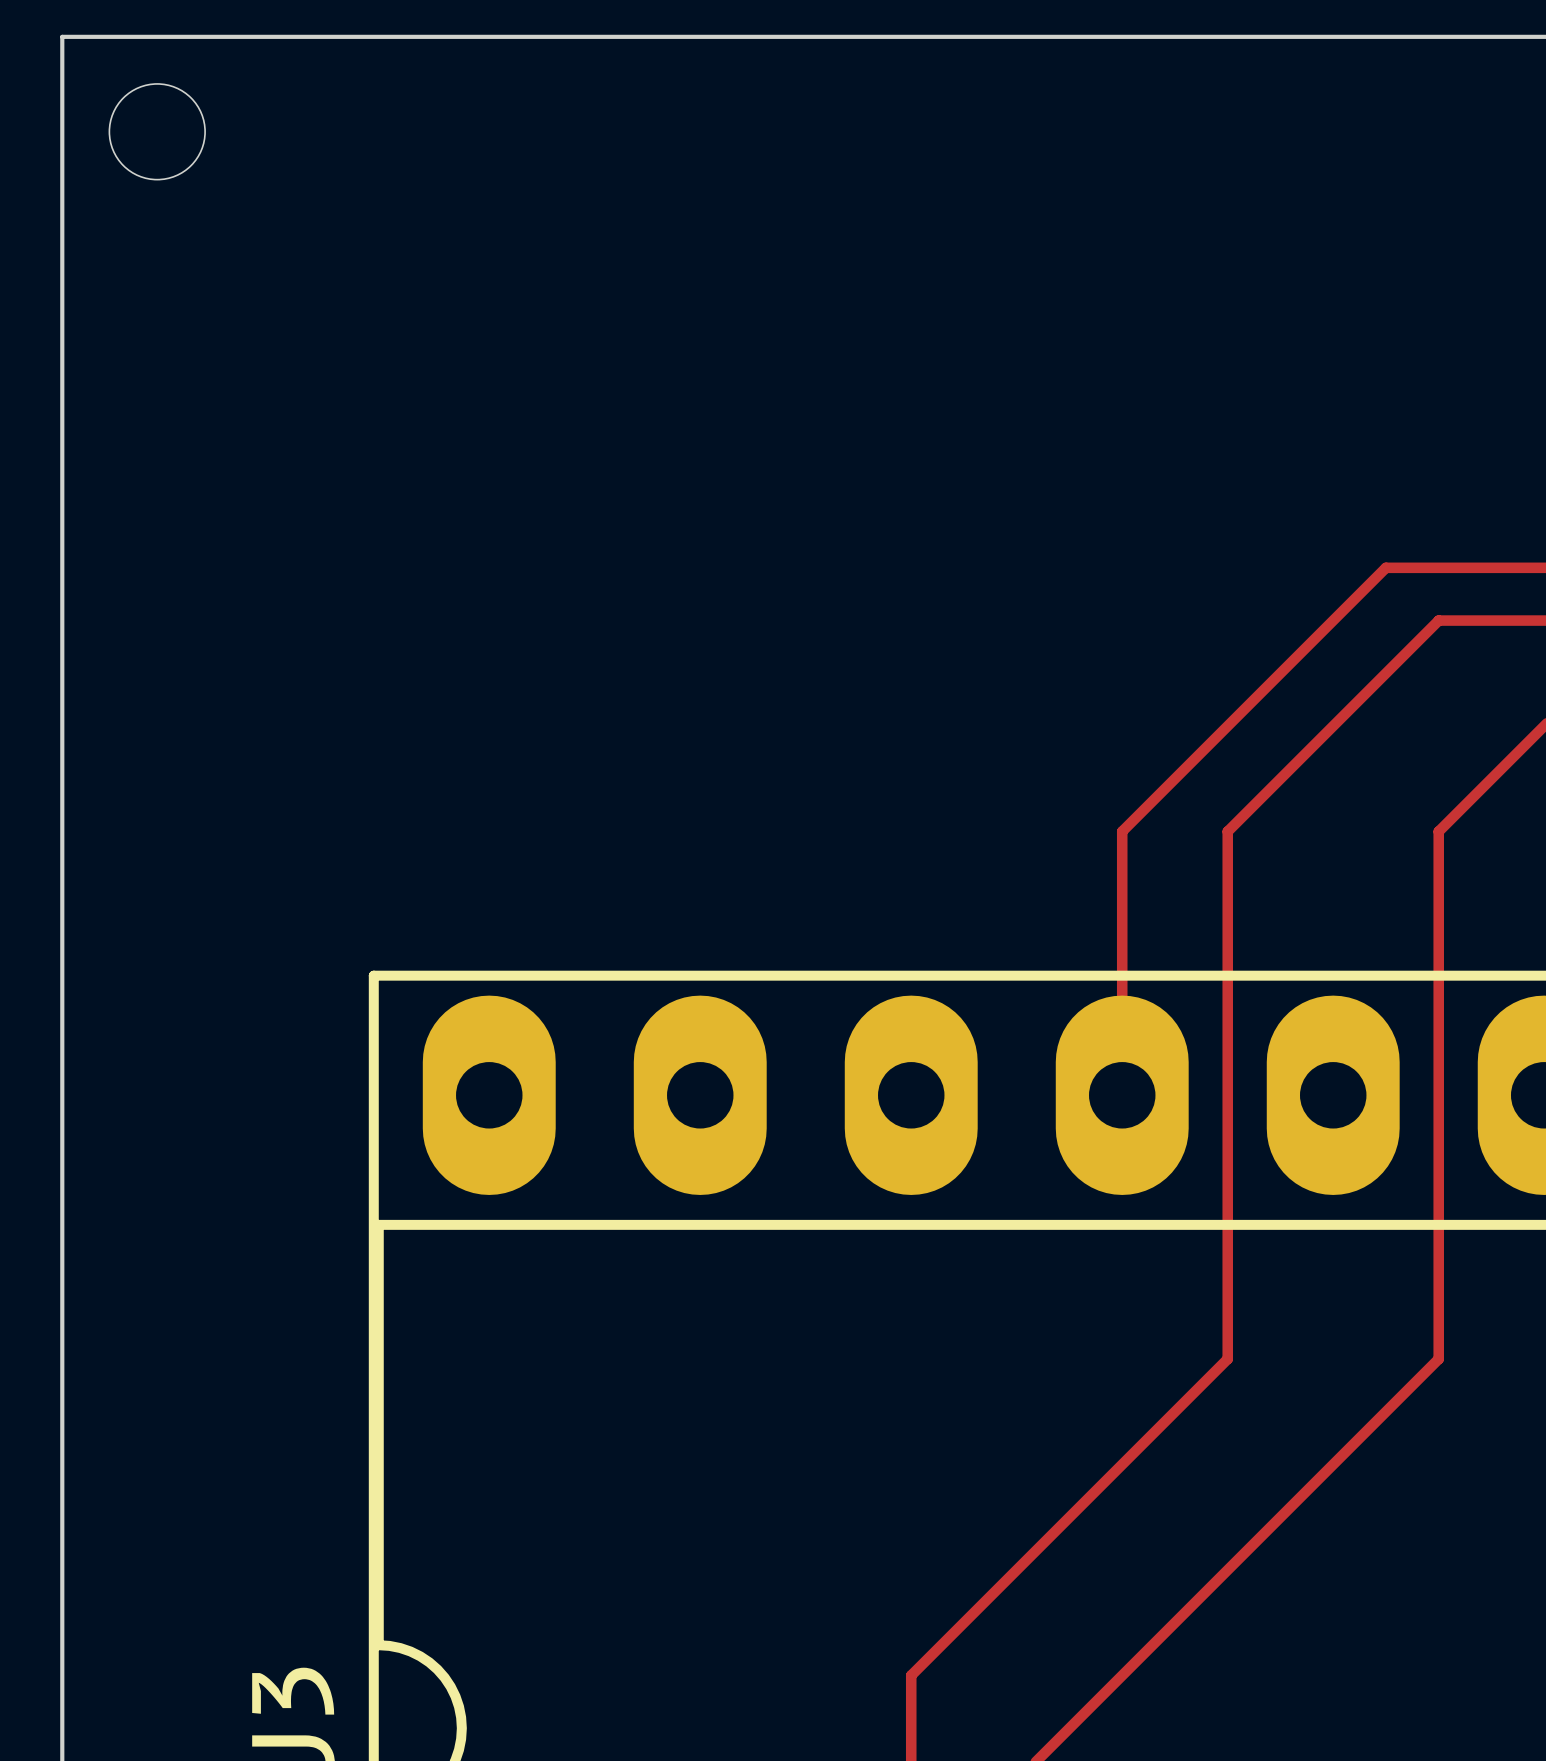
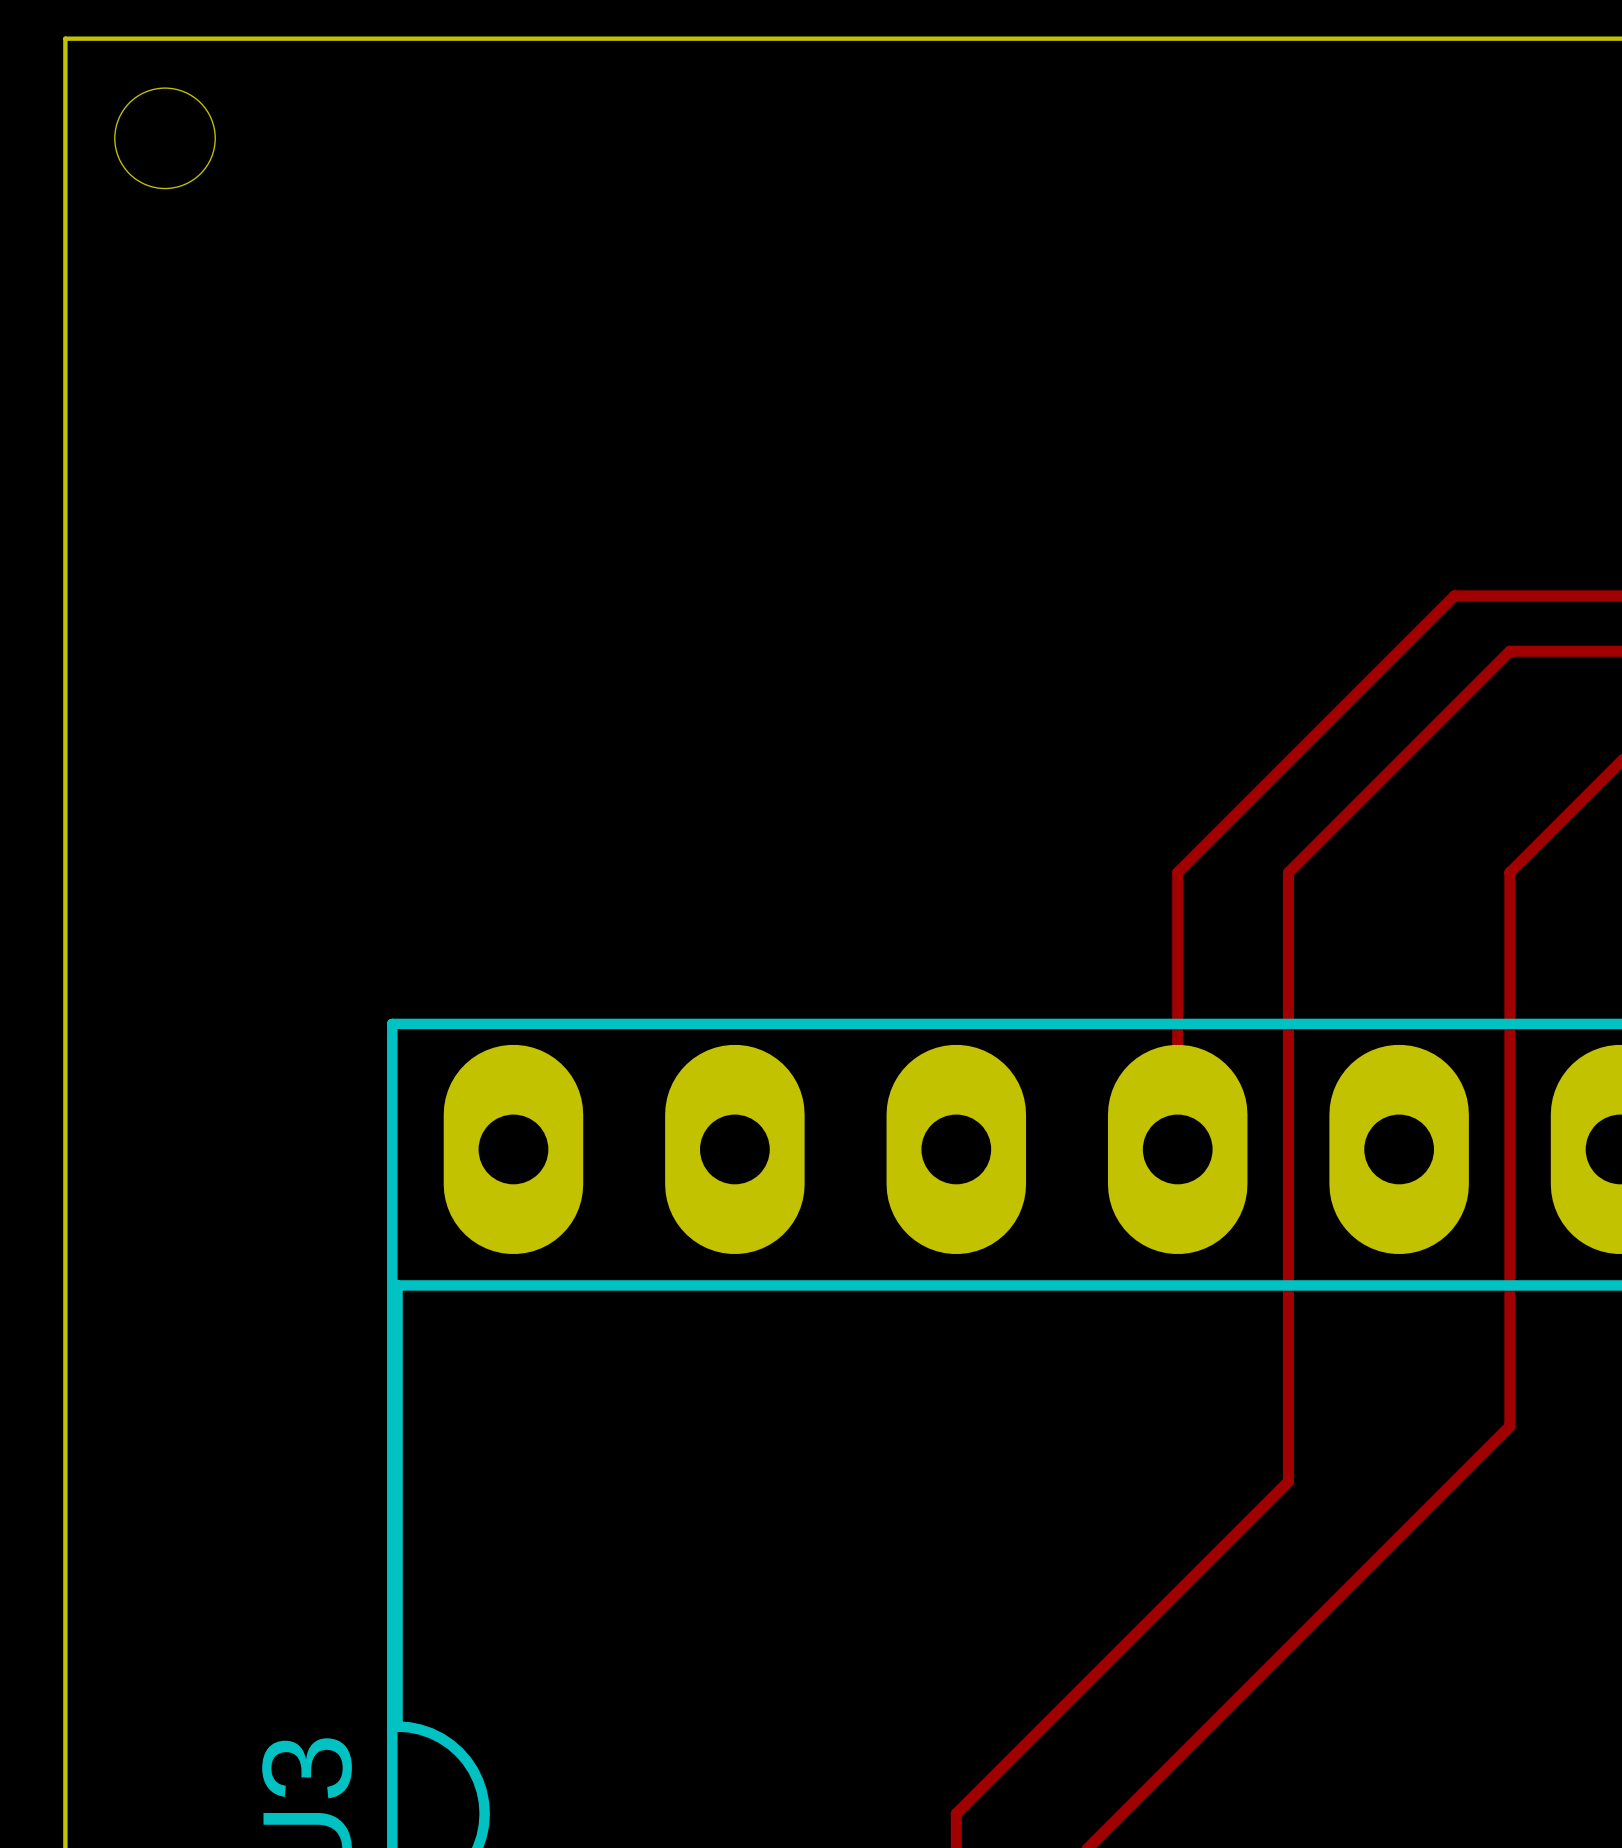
track: (1227, 1359) (911, 1675) (911, 1728) -> (1288, 1426) (1288, 1481) (956, 1813)

